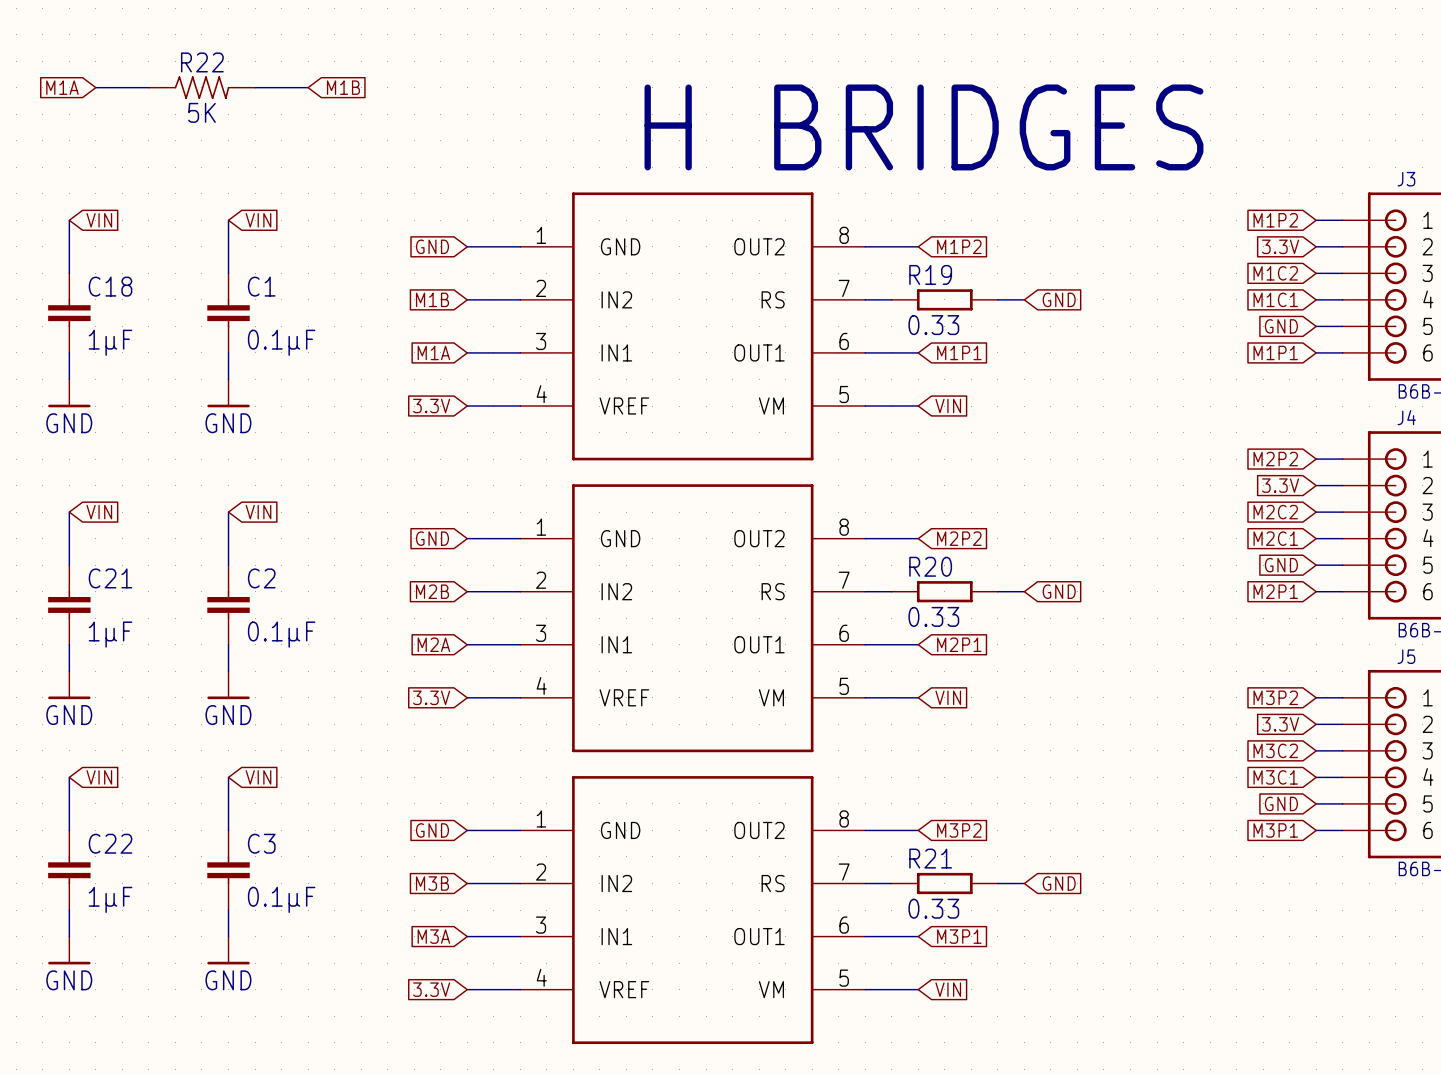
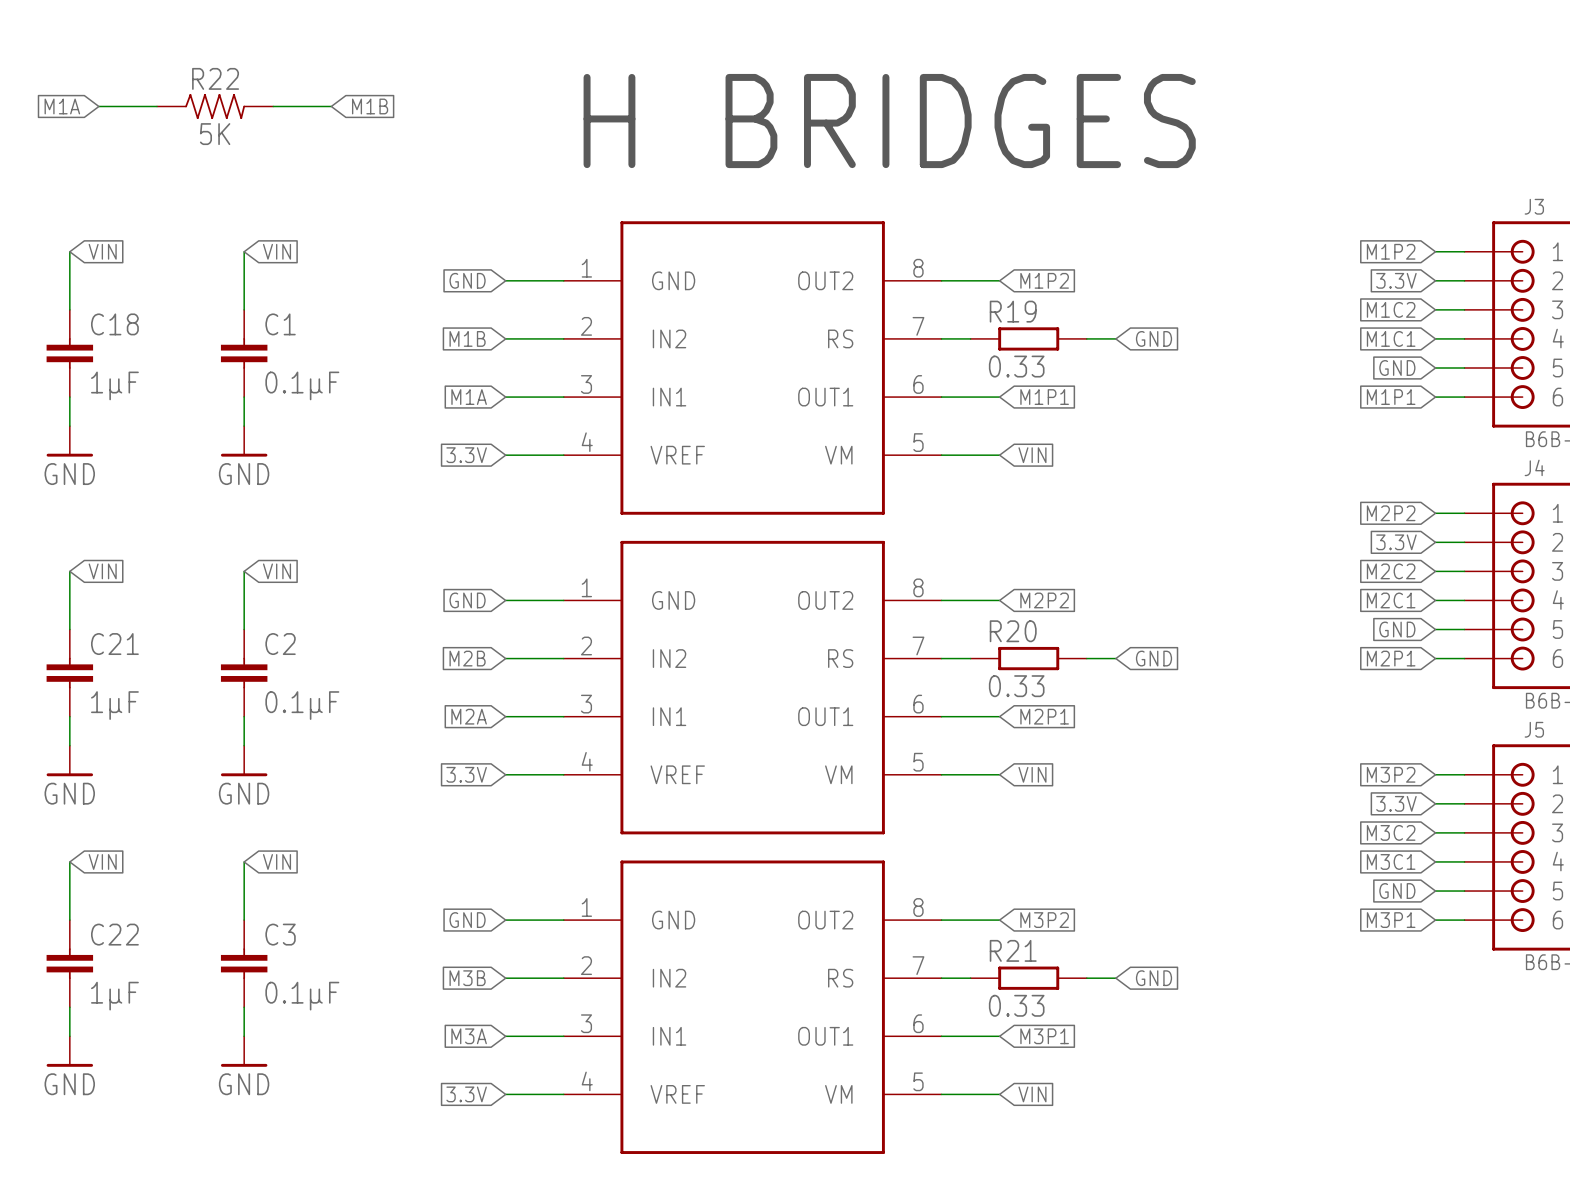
text position: H BRIDGES (923, 127) -> H BRIDGES (889, 121)

